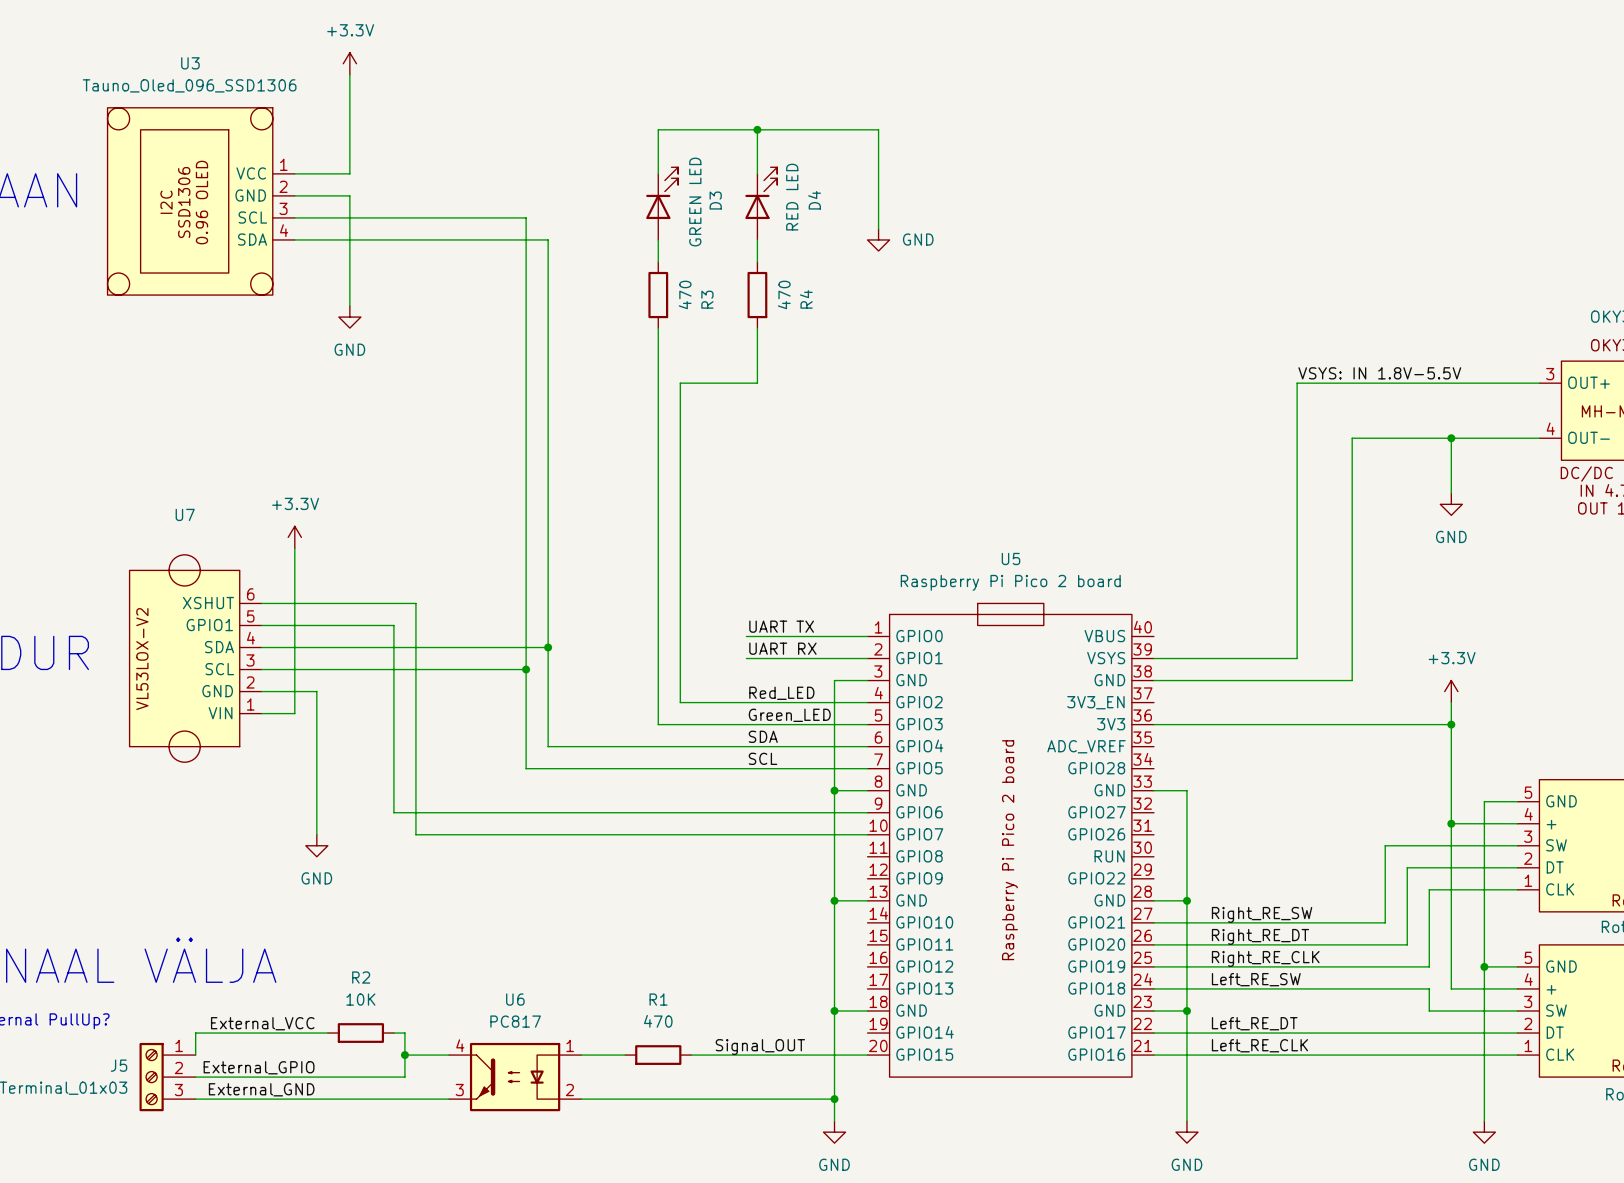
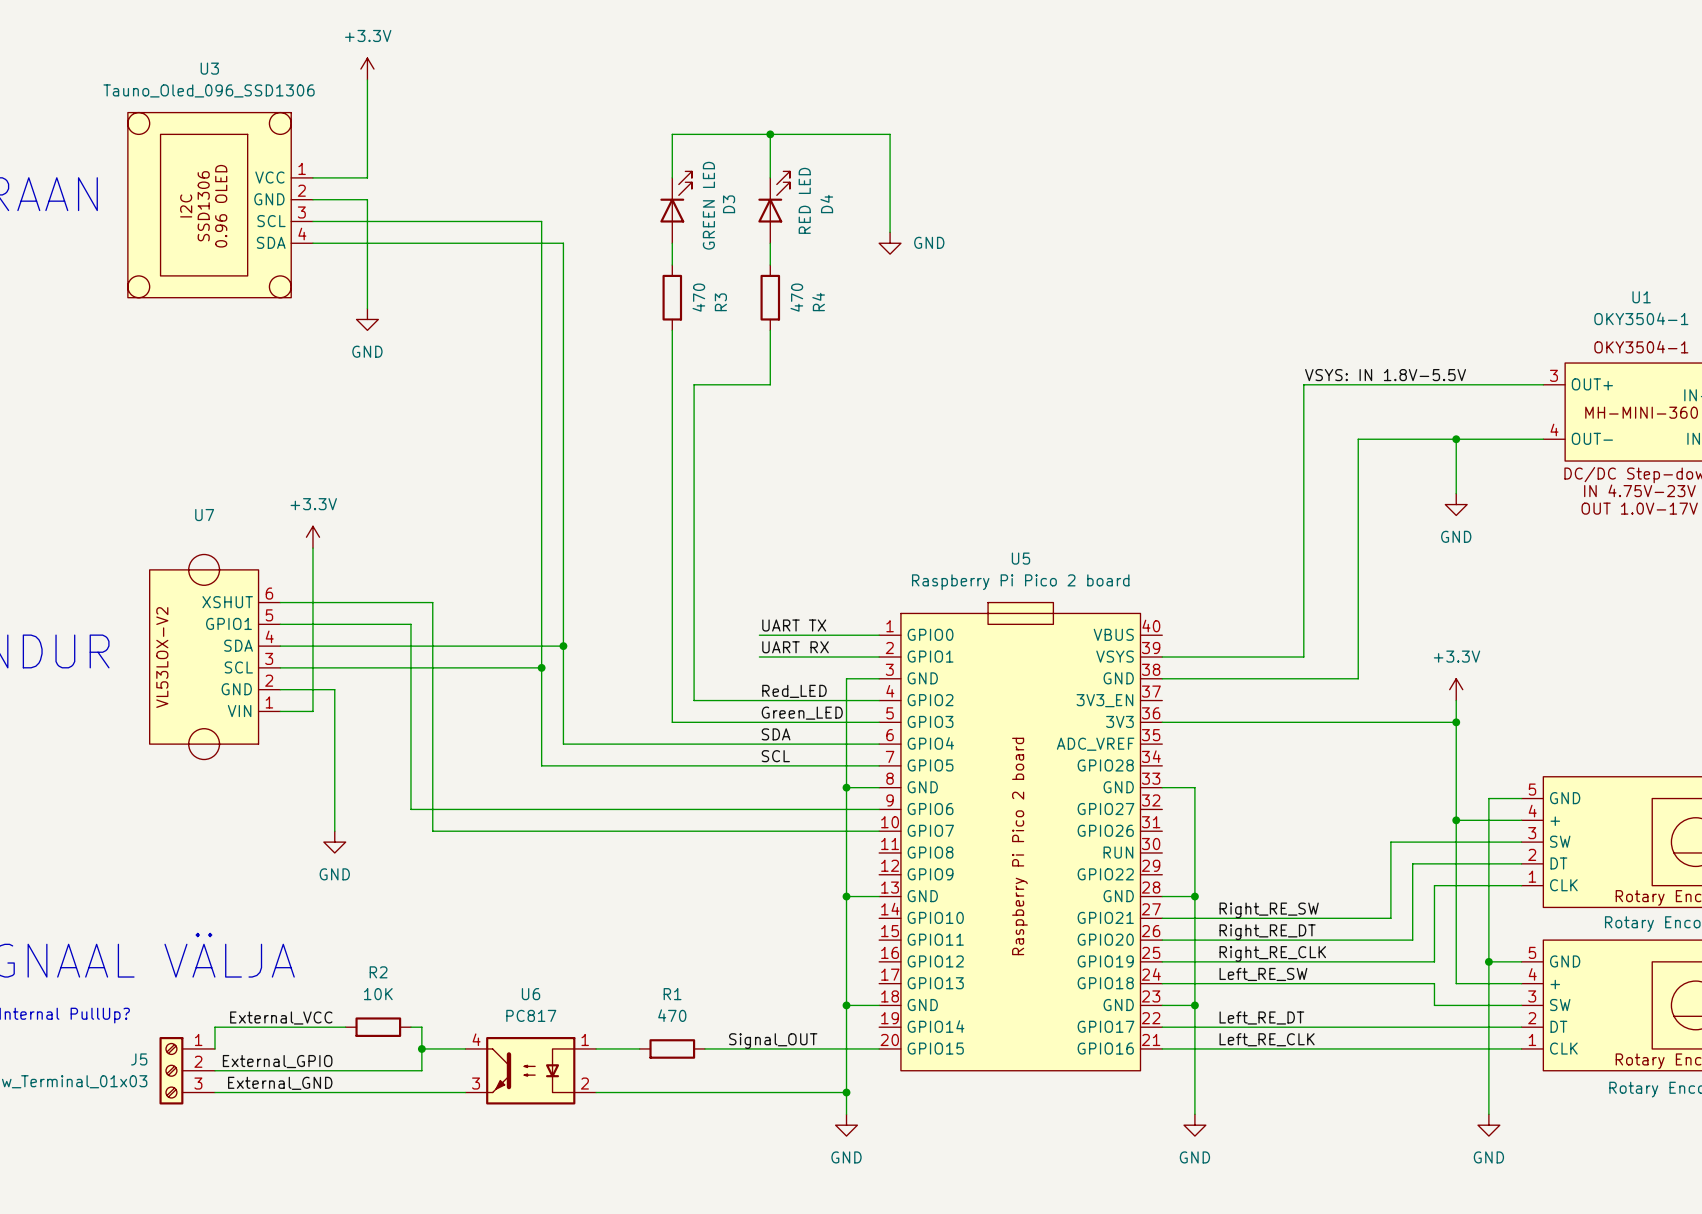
U5 symbol: [867, 603, 1154, 1078] -> [879, 602, 1163, 1071]

